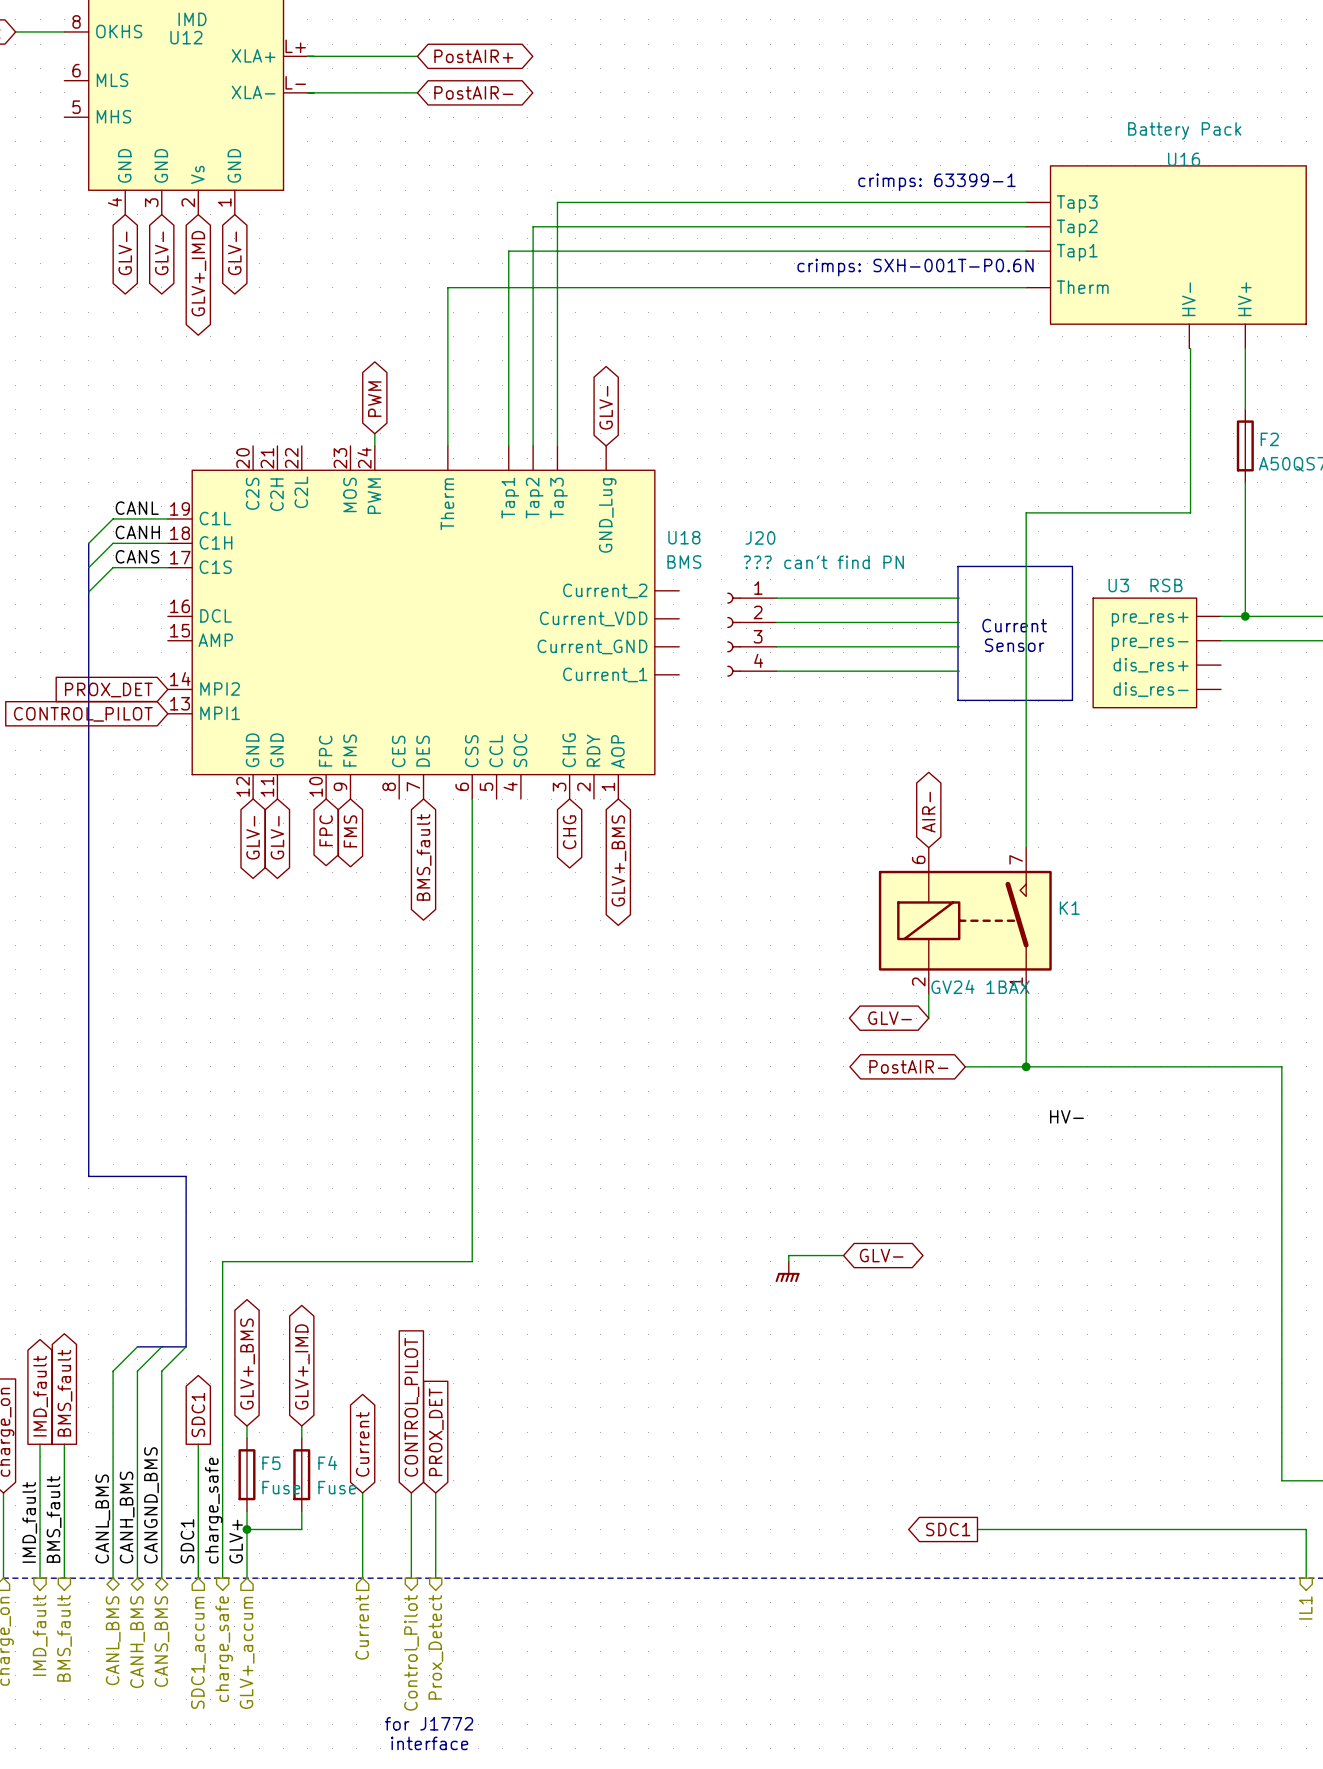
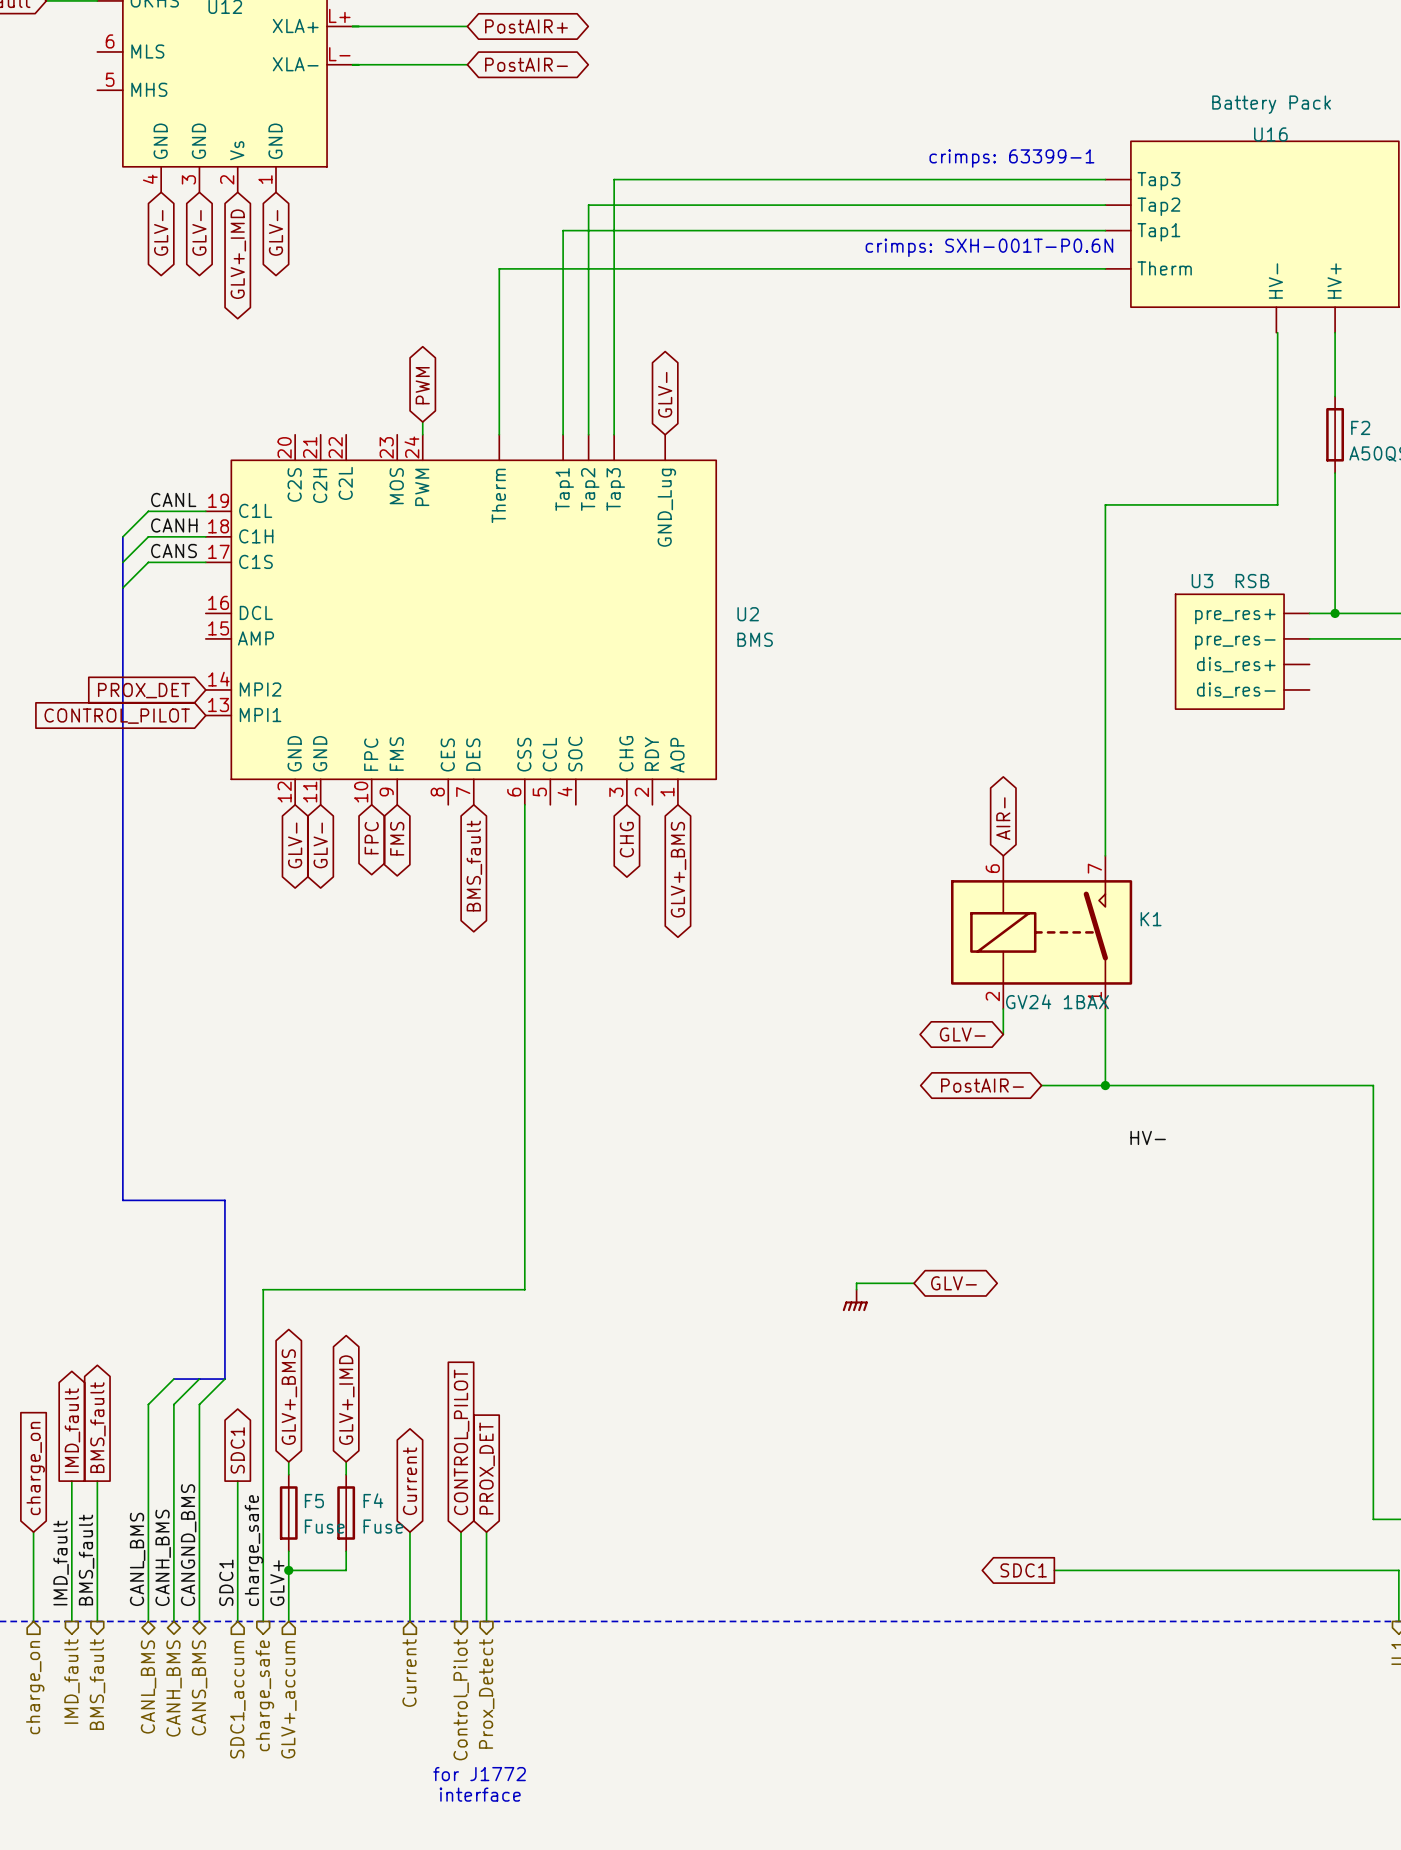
line: (958, 566) (1072, 566) (1072, 700) (958, 700) (958, 566) -> none
wire: (776, 598) (959, 598) -> none
U2: none -> BMS (461, 619)
U18: BMS (423, 622) -> none
wire: (776, 622) (959, 622) -> none
text: Current (1014, 625) -> none
J20: ??? can't find PN (751, 634) -> none
text: Sensor (1014, 645) -> none
wire: (776, 646) (959, 646) -> none
wire: (776, 671) (959, 671) -> none

